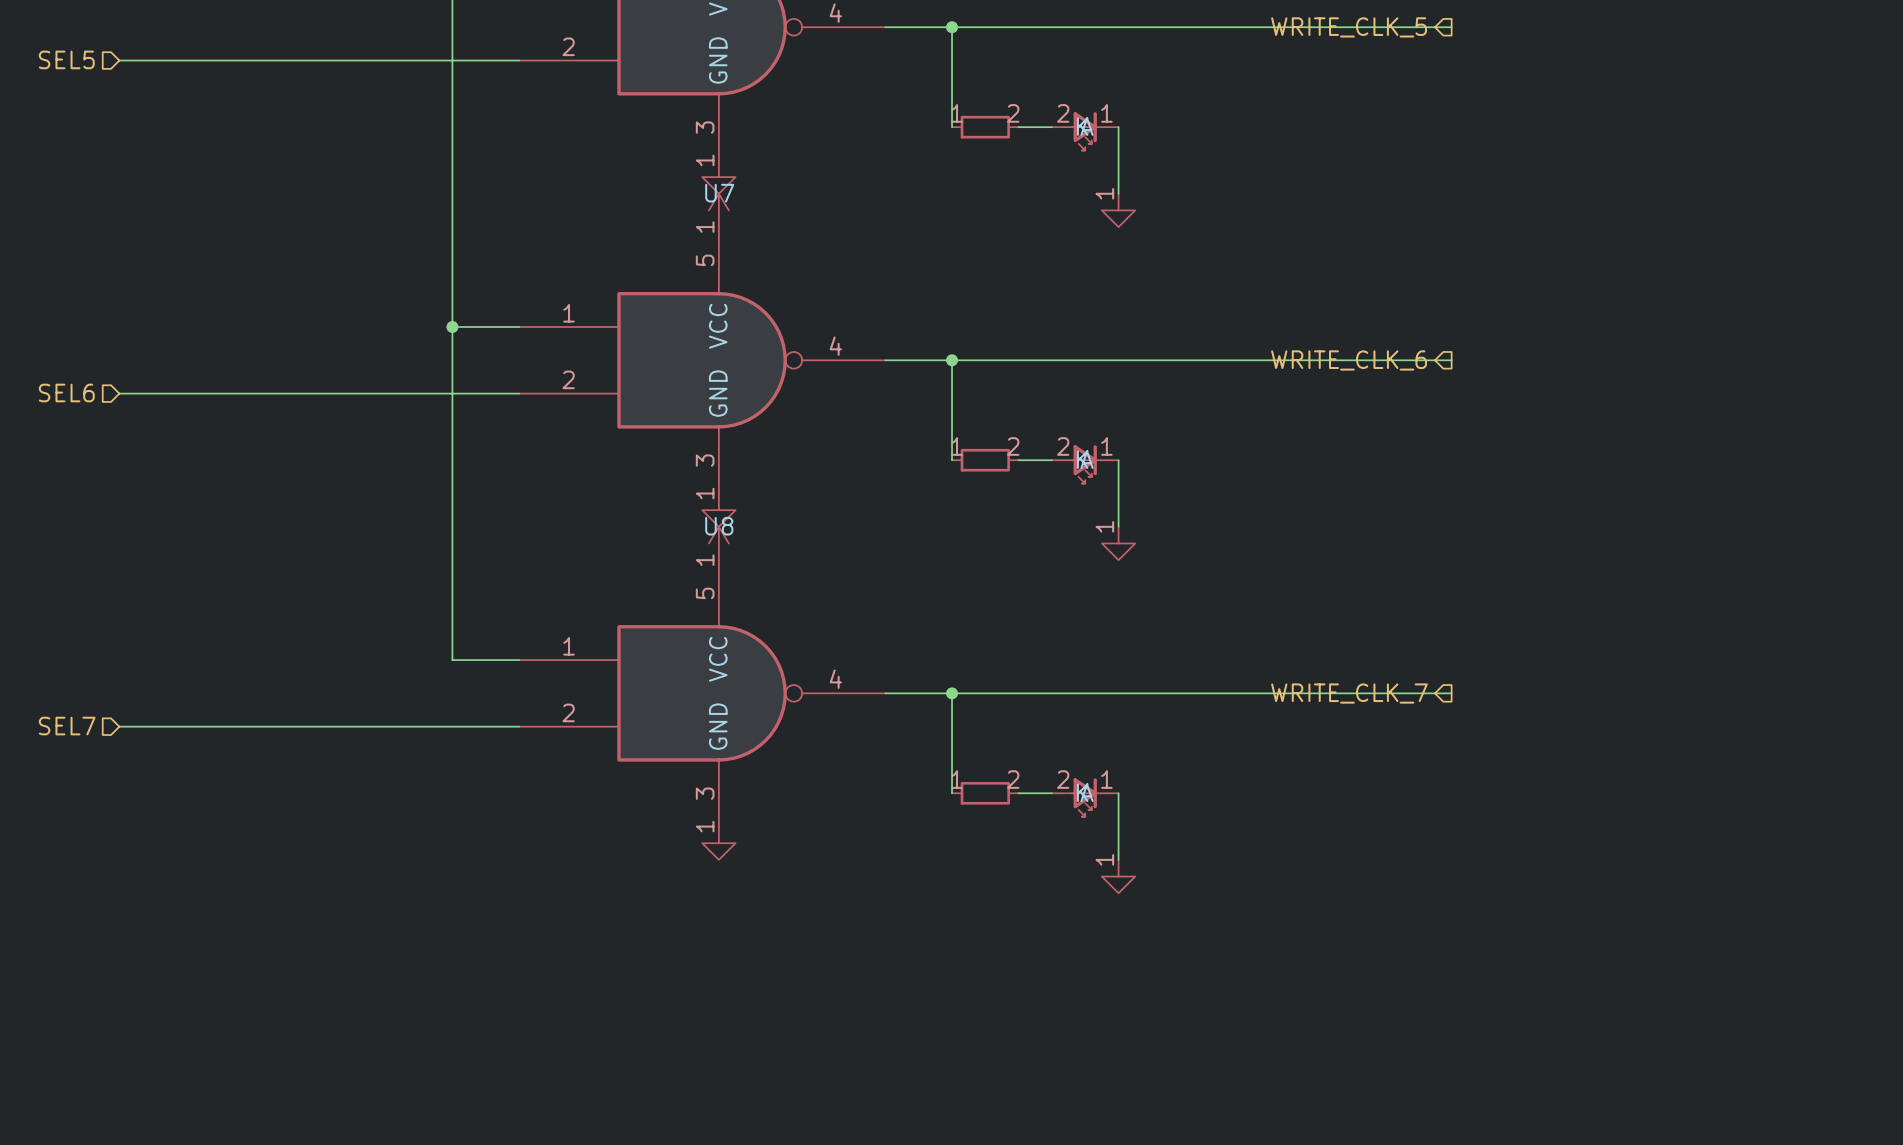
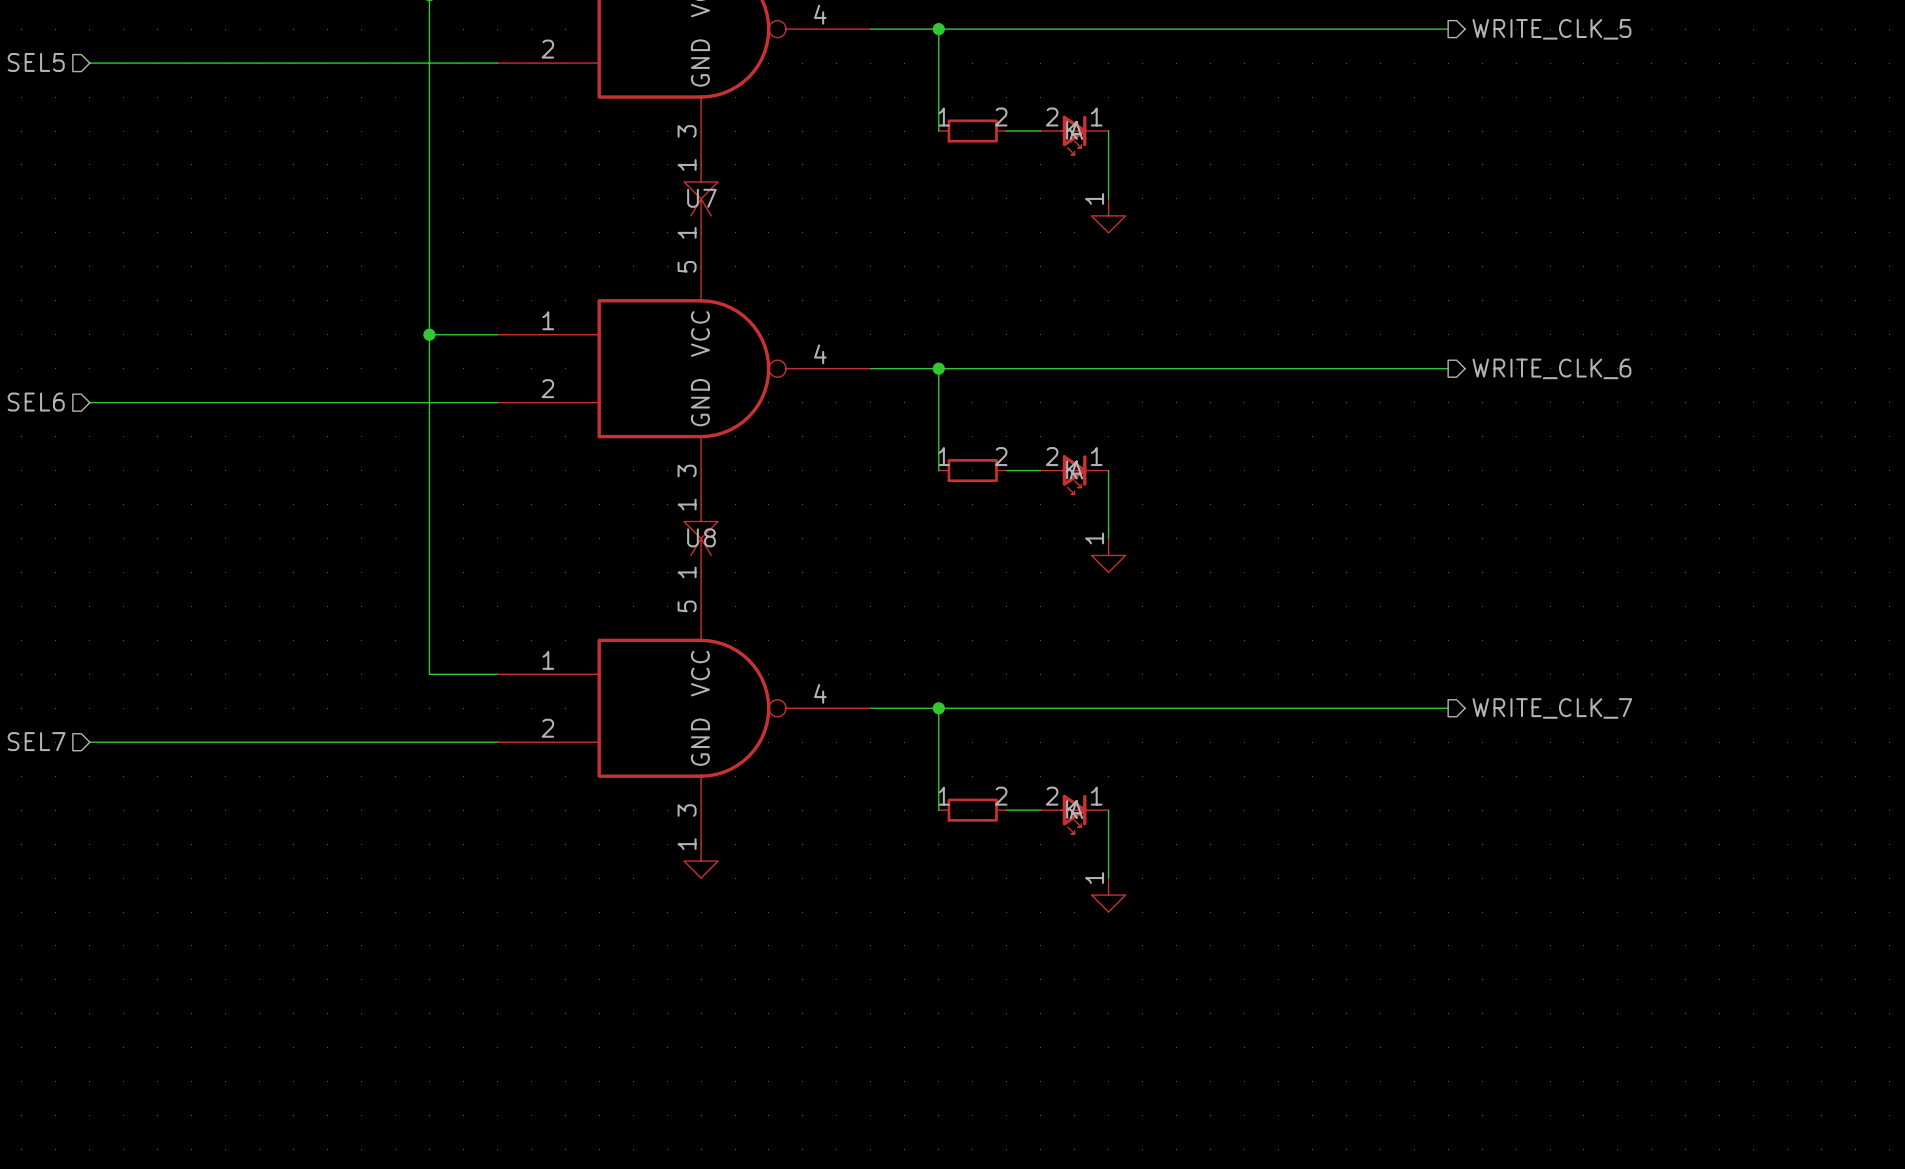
hierarchical label rotation: 0° (1349, 27) -> 180° (1551, 29)
hierarchical label position: WRITE_CLK_5 (1349, 27) -> WRITE_CLK_5 (1551, 29)
hierarchical label rotation: 0° (1349, 360) -> 180° (1551, 368)
hierarchical label position: WRITE_CLK_6 (1349, 360) -> WRITE_CLK_6 (1551, 368)
hierarchical label rotation: 0° (1349, 693) -> 180° (1552, 708)
hierarchical label position: WRITE_CLK_7 (1349, 693) -> WRITE_CLK_7 (1552, 708)

